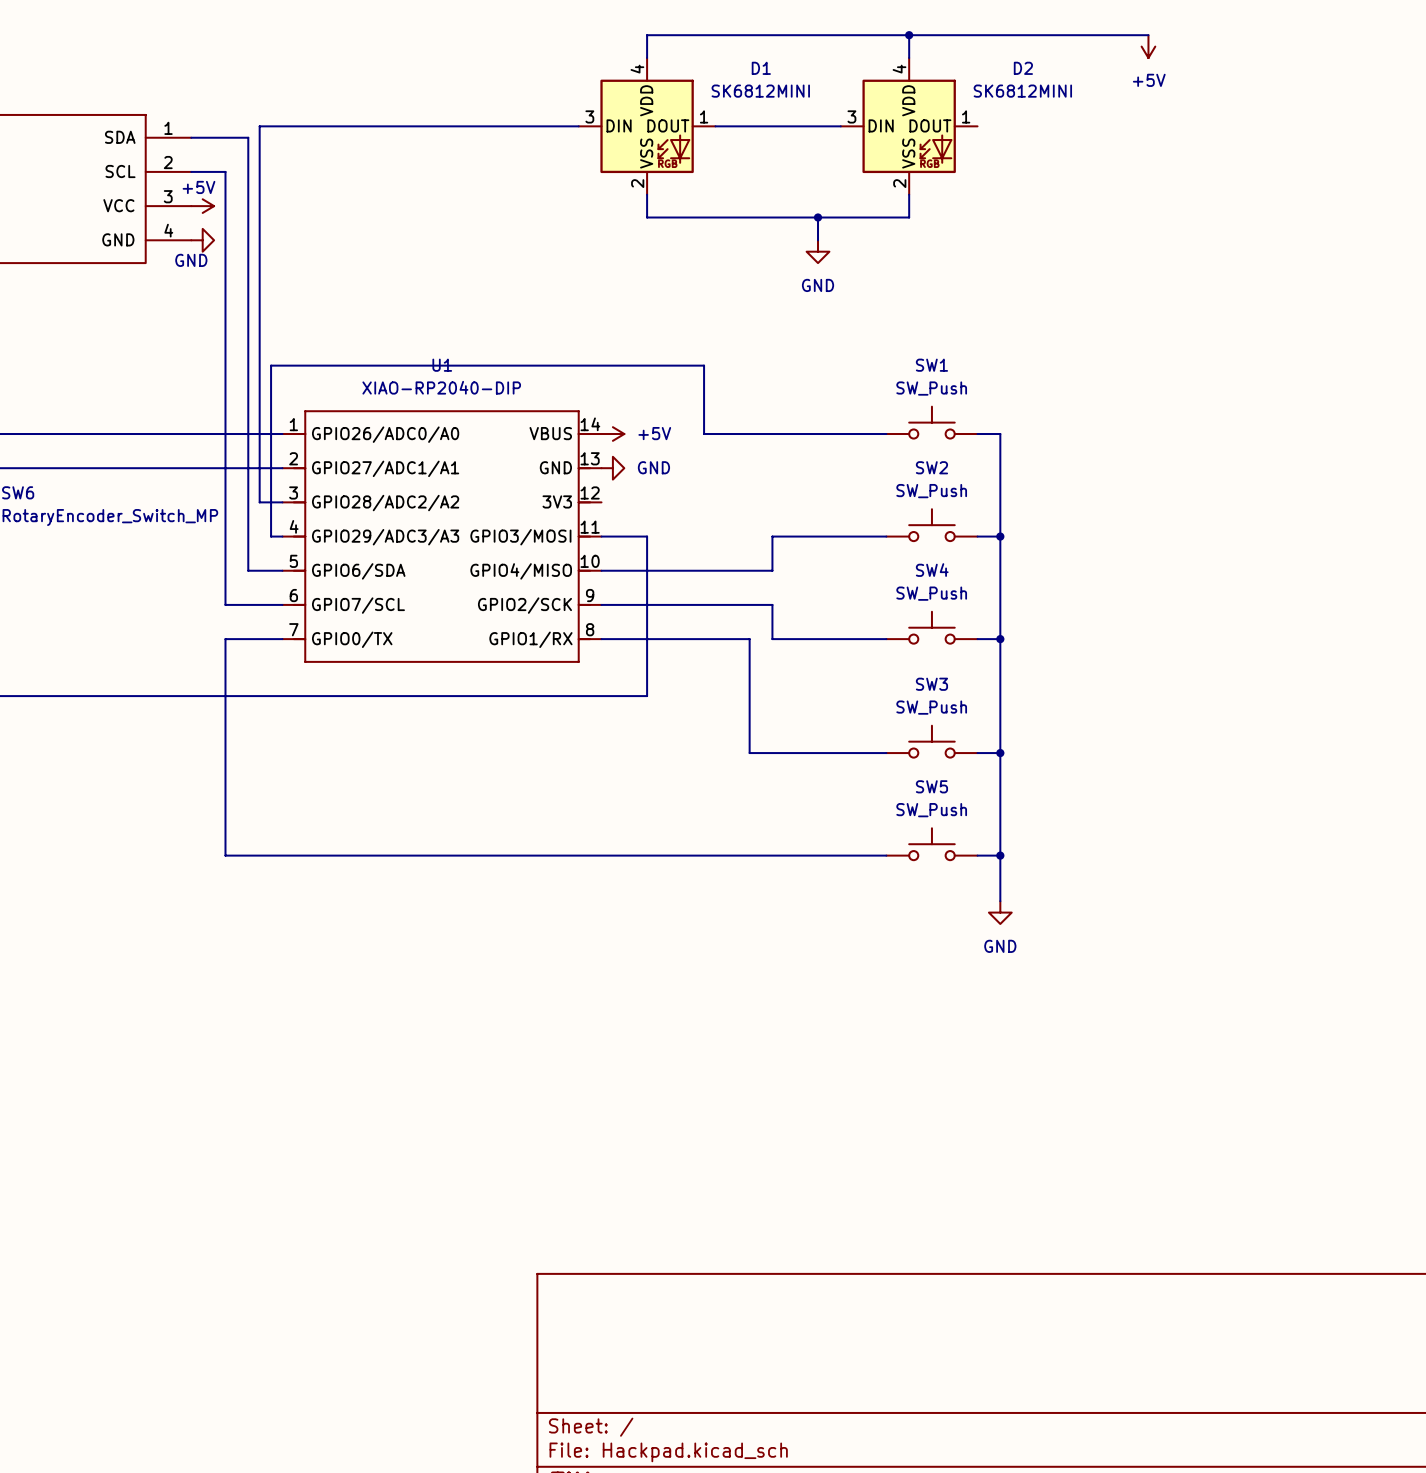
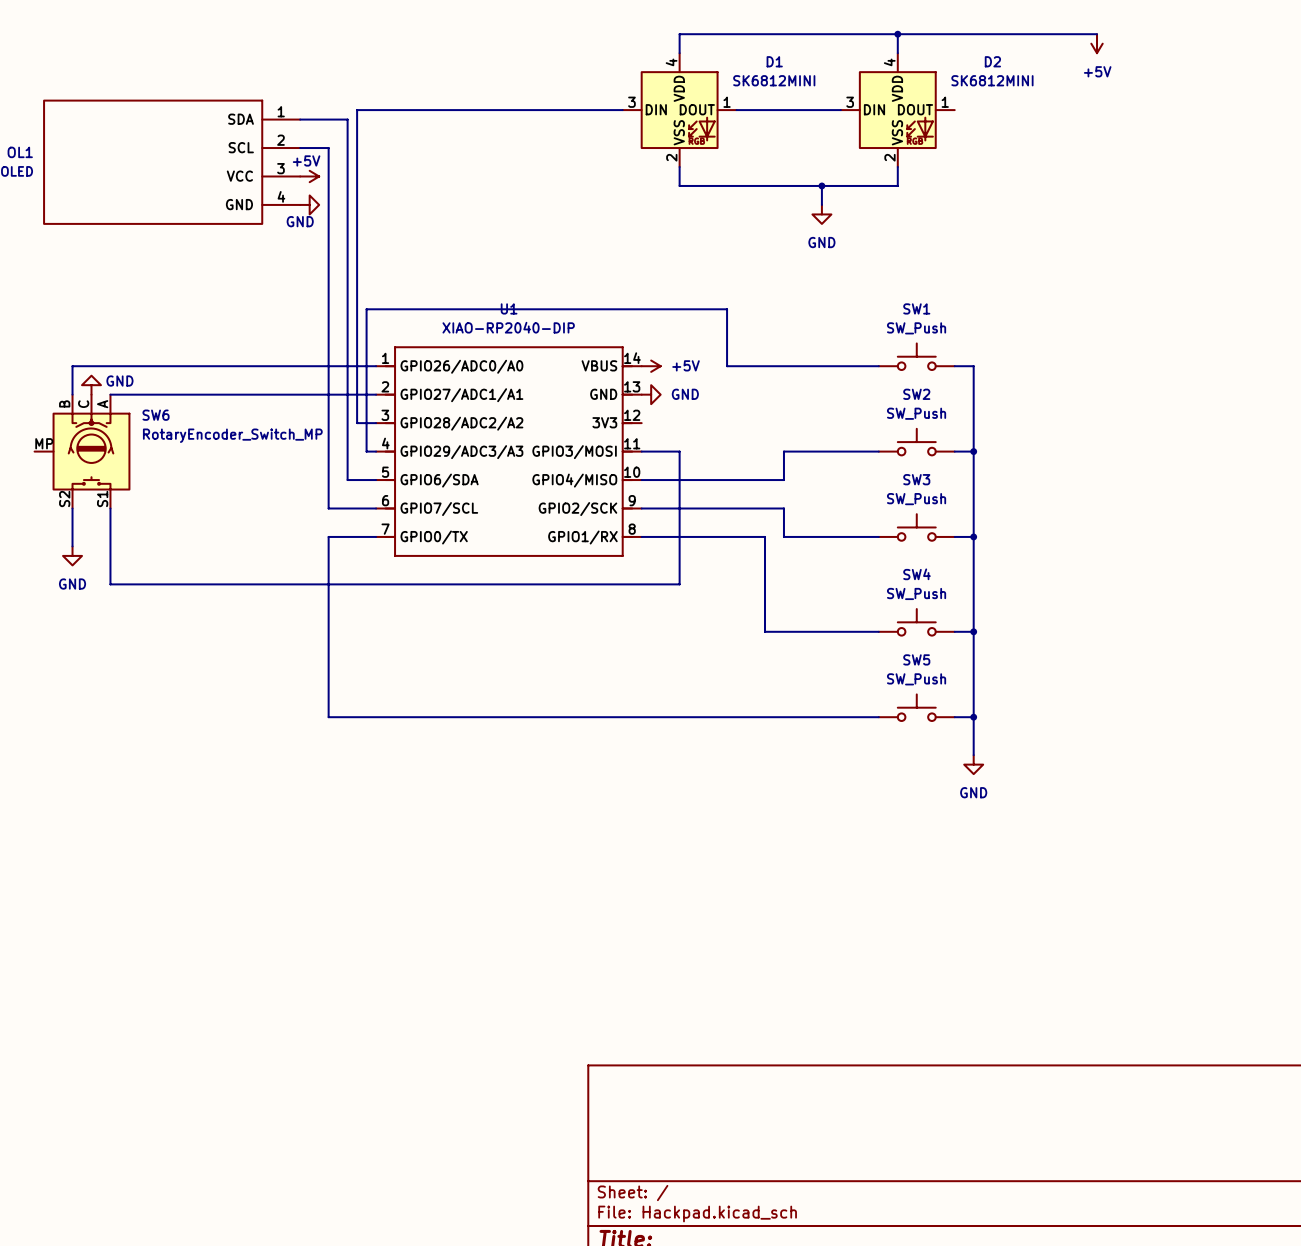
SW4 name: SW4 (932, 570) -> SW3 (916, 479)
SW3 name: SW3 (931, 684) -> SW4 (917, 574)

